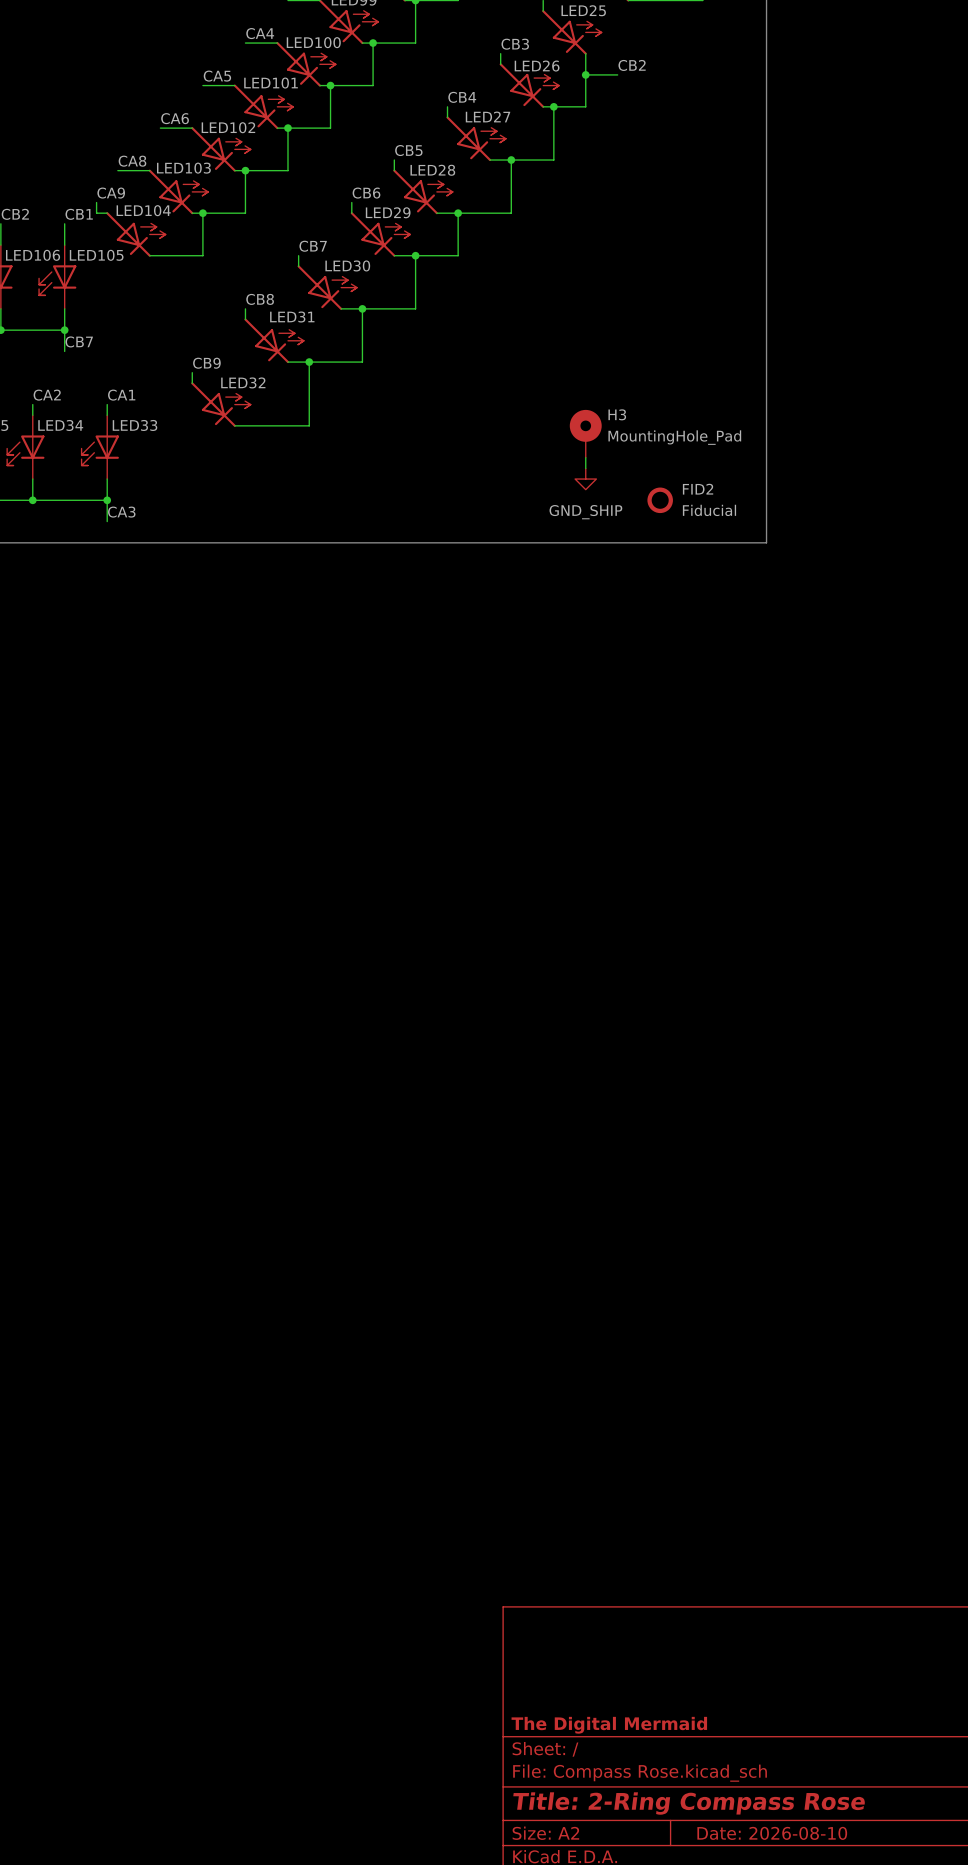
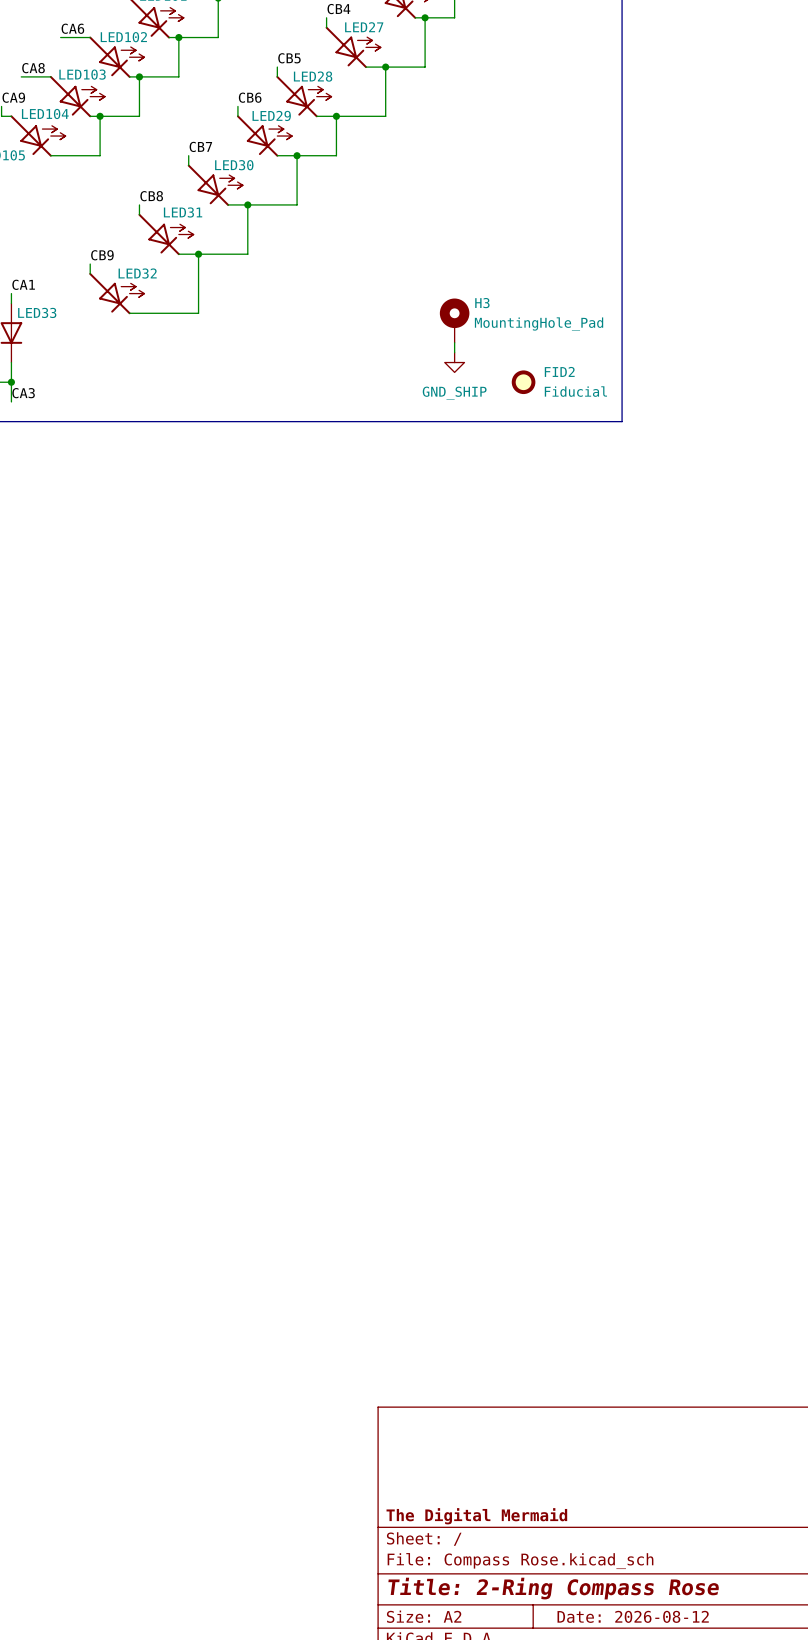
title block: Date: 2026-08-10 (772, 1833) -> Date: 2026-08-12 (633, 1616)

